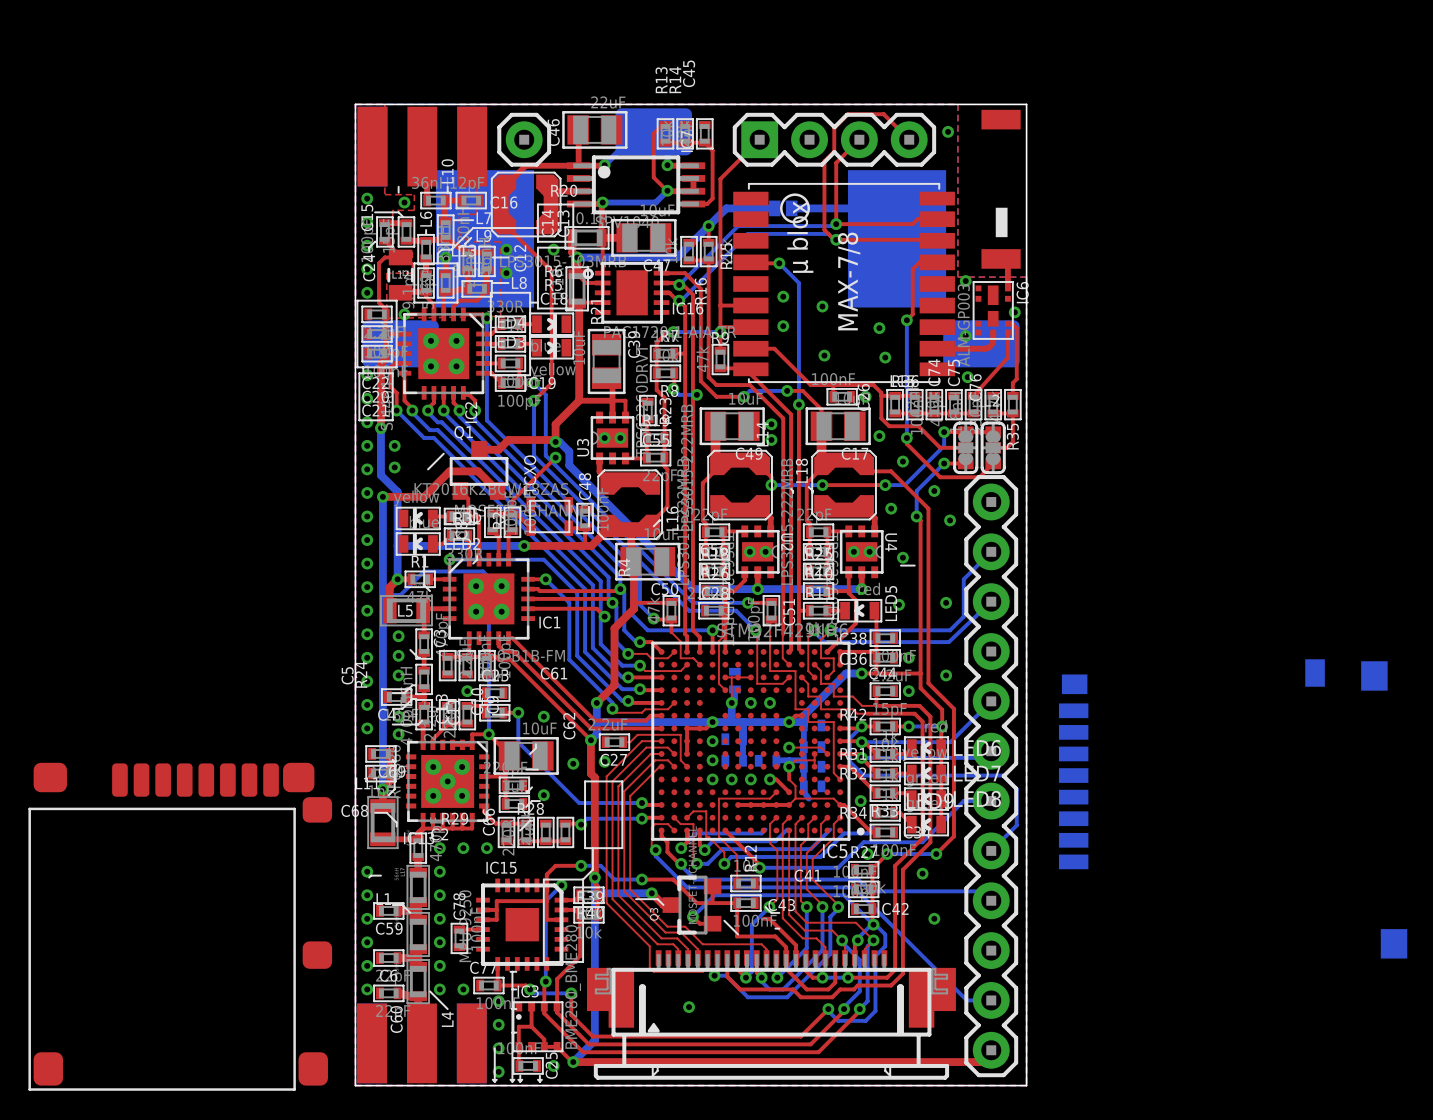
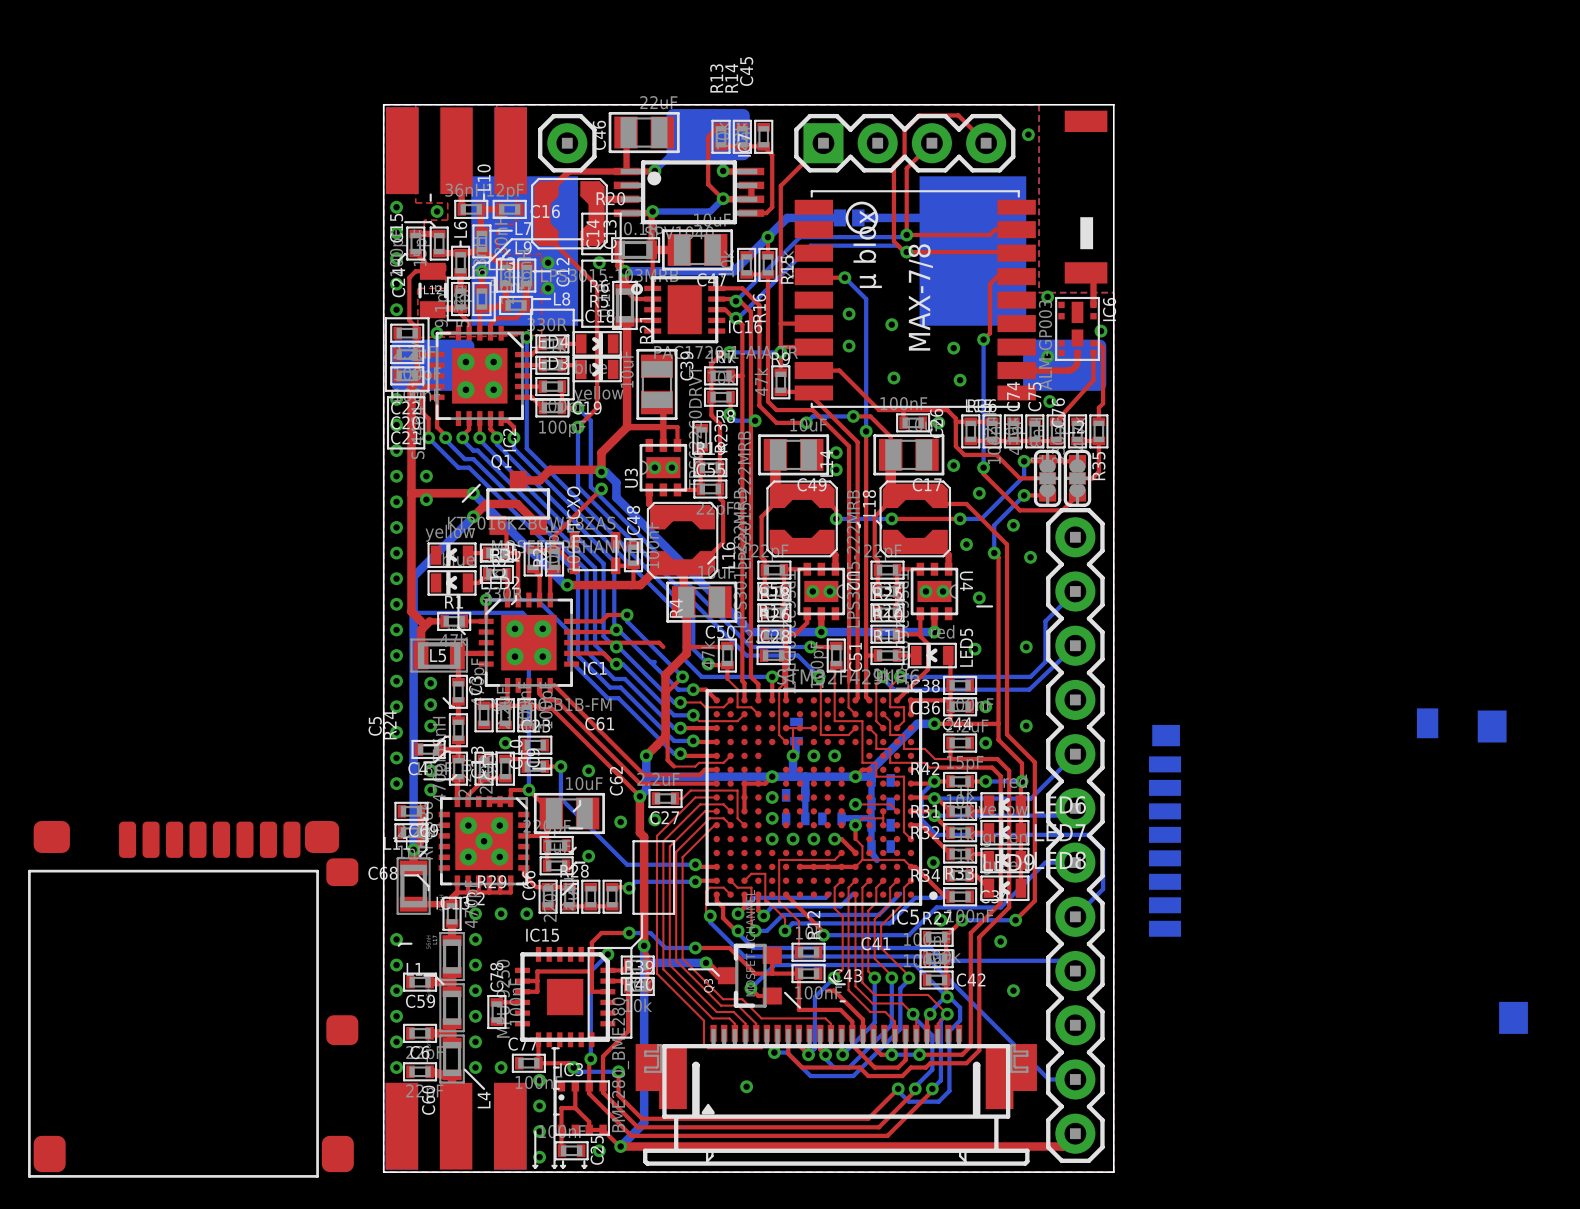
top track: none -> (411, 457) (411, 611) (421, 621)
bottom track: (380, 428) (380, 475) (397, 491) (397, 579) -> none
via: (380, 428) -> none
bottom track: (437, 430) (592, 585) (592, 647) -> (473, 459) (586, 570) (586, 651) (614, 679) (624, 679) (642, 696)
bottom track: (433, 438) (585, 589) (585, 651) -> (469, 467) (577, 574) (577, 655) (610, 687) (620, 687) (633, 700)
top track: none -> (411, 493) (473, 493)
bottom track: none -> (473, 493) (565, 585)
via: none -> (473, 493)
top track: (437, 483) (424, 496) (382, 496) -> none
via: none -> (473, 516)
bottom track: (382, 496) (382, 538) -> (473, 516) (413, 576)
via: (382, 496) -> none
bottom track: (567, 524) (620, 577) (620, 589) (624, 593) (624, 630) (636, 642) -> (614, 561) (614, 627) (618, 629)
bottom track: (557, 526) (608, 577) (608, 598) (616, 606) (616, 642) (628, 653) -> (603, 563) (603, 636) (614, 646) (618, 646) (674, 702) (680, 702)
bottom track: (549, 530) (600, 581) (600, 644) -> (595, 568) (595, 644) (614, 664) (622, 664) (650, 691)
bottom track: (397, 545) (524, 545) -> none
bottom track: (496, 559) (543, 559) (571, 587) -> (537, 600) (569, 632) (569, 659) (607, 698) (618, 698) (624, 704)
bottom track: (424, 571) (400, 595) (382, 595) -> (458, 612) (413, 612)
top track: none -> (627, 614) (607, 614) (601, 621) (590, 621)
bottom track: none -> (627, 614) (627, 621) (682, 676)
via: none -> (627, 614)
via: (397, 579) -> none
bottom track: (545, 579) (569, 602) (569, 659) (612, 702) (612, 708) -> none
via: (545, 579) -> none
via: none -> (616, 629)
top track: (537, 589) (539, 591) (618, 591) (620, 589) -> (582, 632) (614, 632) (616, 629)
via: (620, 589) -> none
bottom track: (577, 593) (577, 655) -> (624, 636) (678, 689) (688, 689)
via: none -> (616, 646)
via: (612, 602) -> none
top track: (557, 608) (596, 608) (604, 616) -> (603, 653) (616, 664)
via: (604, 616) -> none
via: none -> (616, 664)
via: none -> (682, 676)
top track: (612, 708) (616, 712) (622, 712) -> (682, 676) (667, 691) (667, 760) (674, 766)
via: (612, 708) -> none

